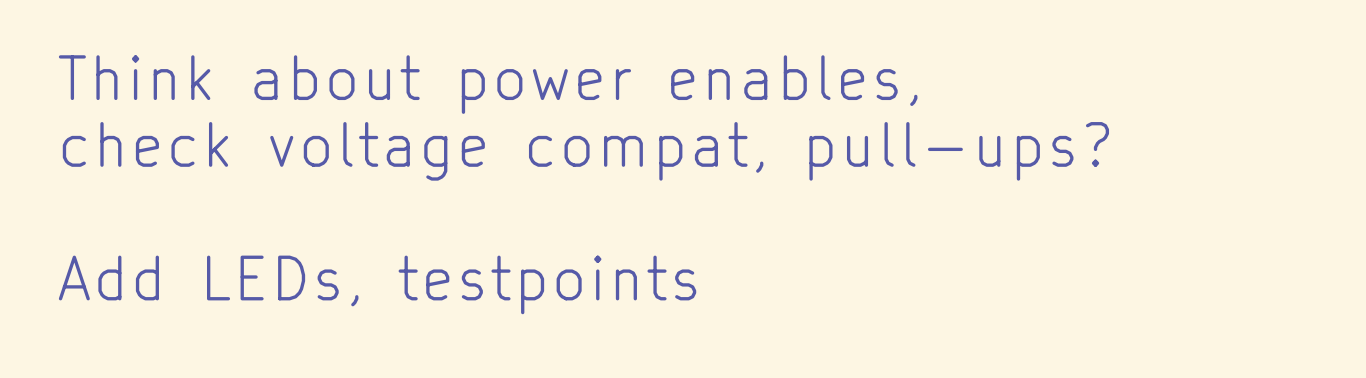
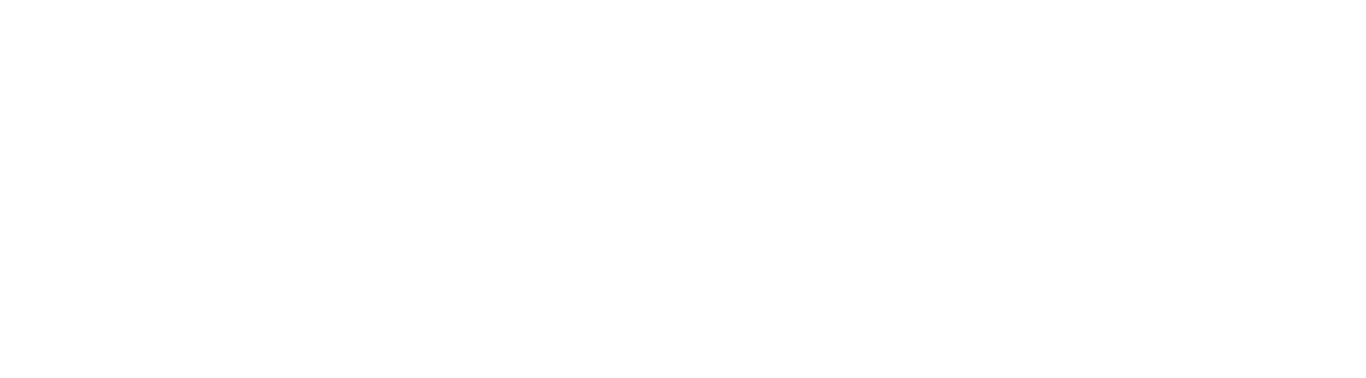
text: Think about power enables, (488, 84) -> none
text: check voltage compat, pull-ups? (585, 151) -> none
text: Add LEDs, testpoints (377, 284) -> none

